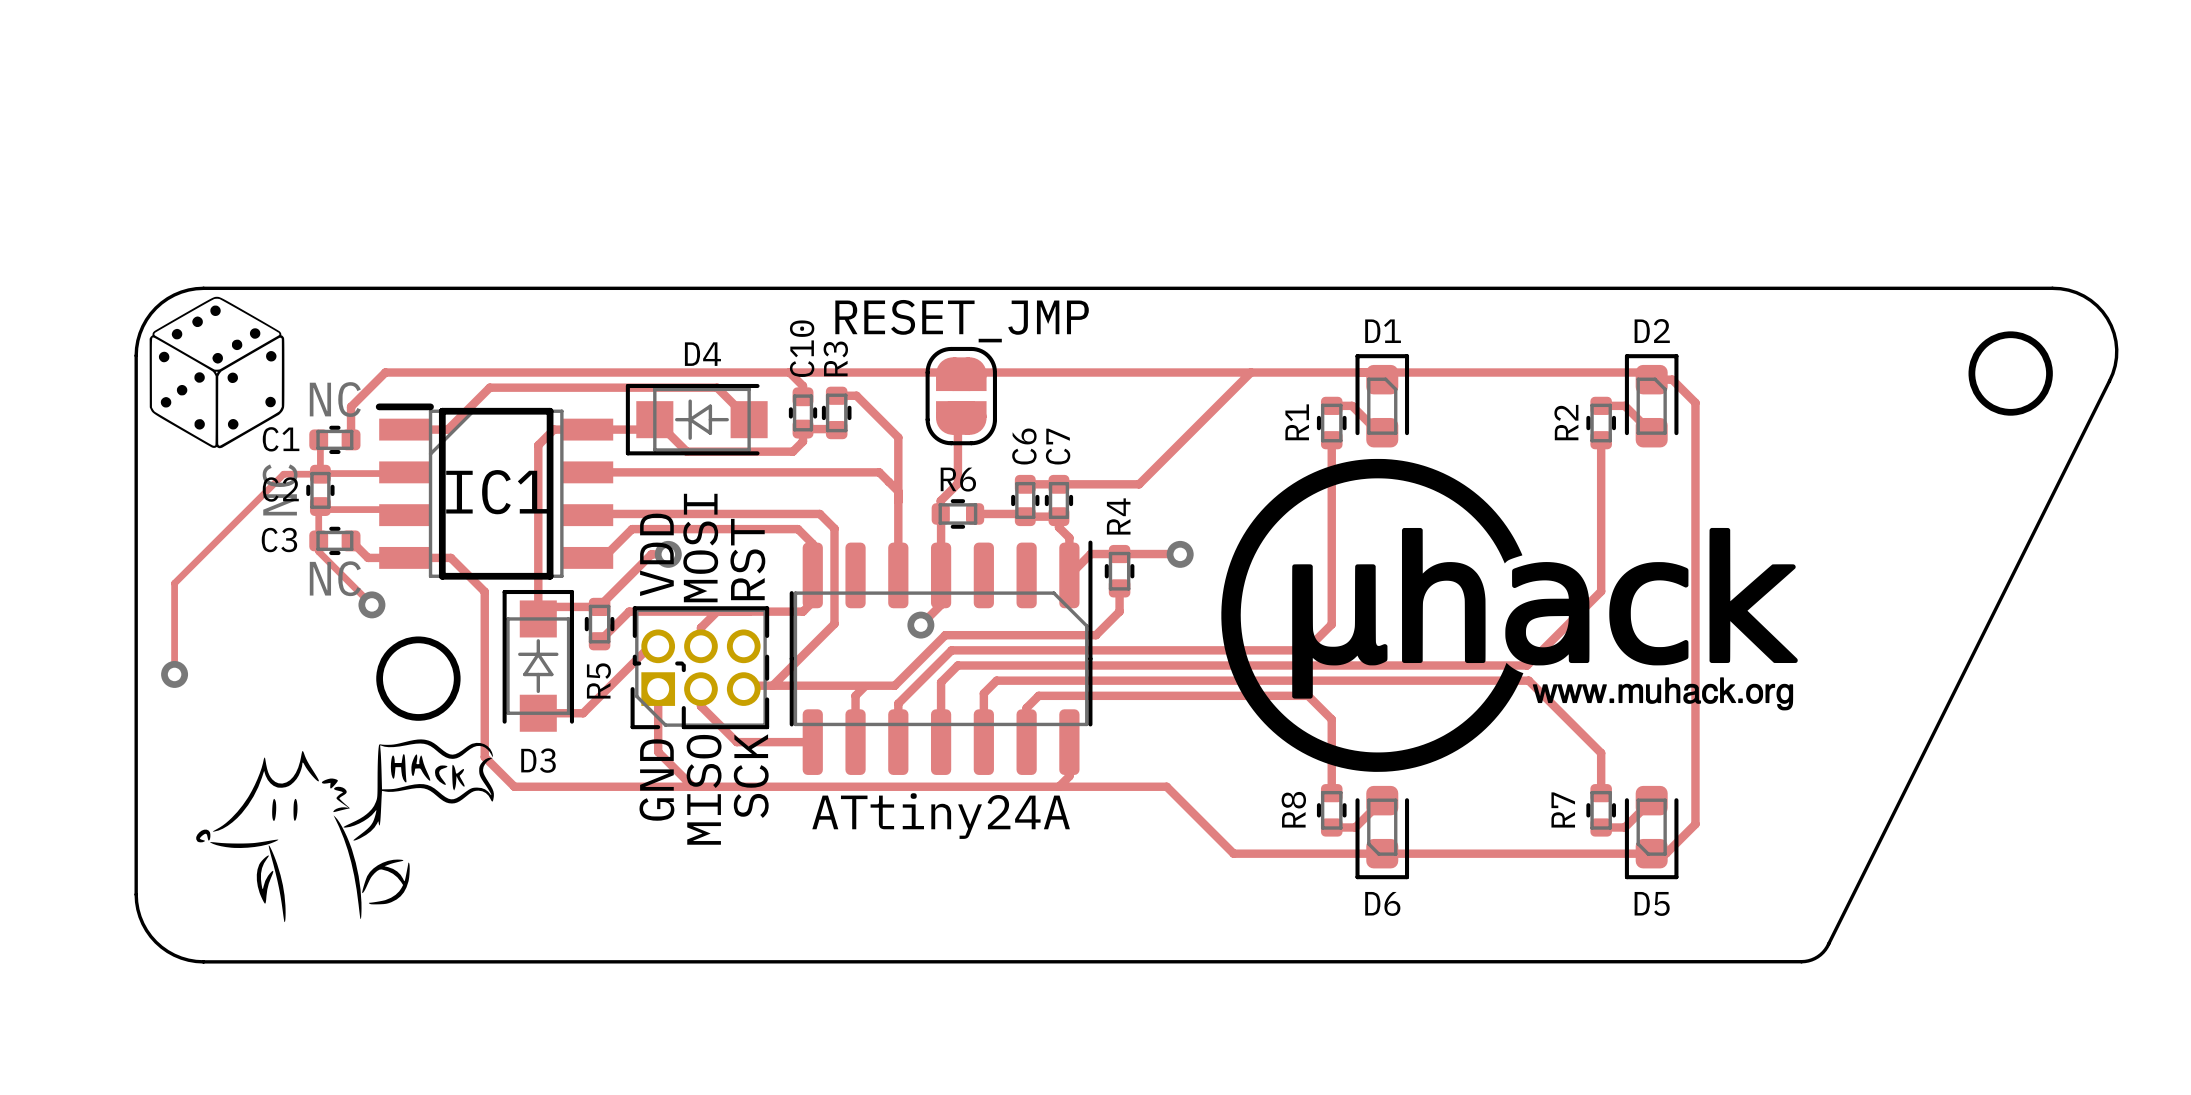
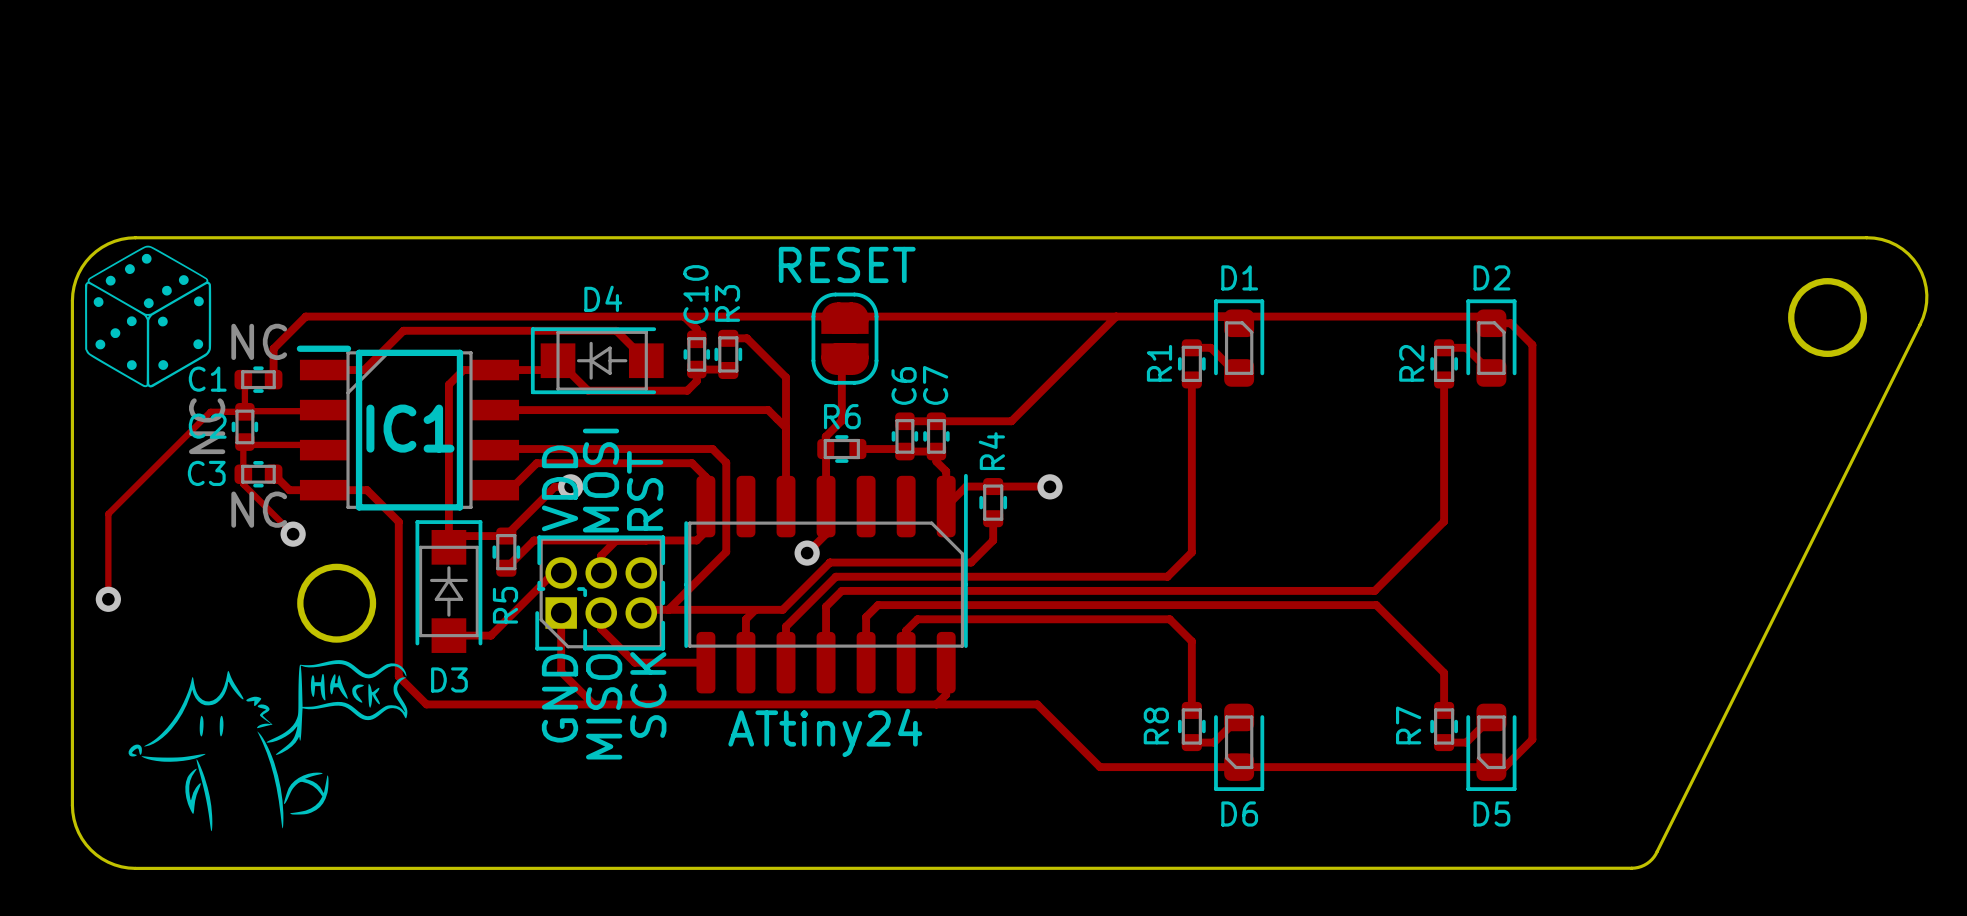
part value: RESET_JMP (962, 321) -> RESET (847, 264)
drawing: [1221, 458, 1798, 772] -> none
part value: ATtiny24A (941, 816) -> ATtiny24 (825, 732)

